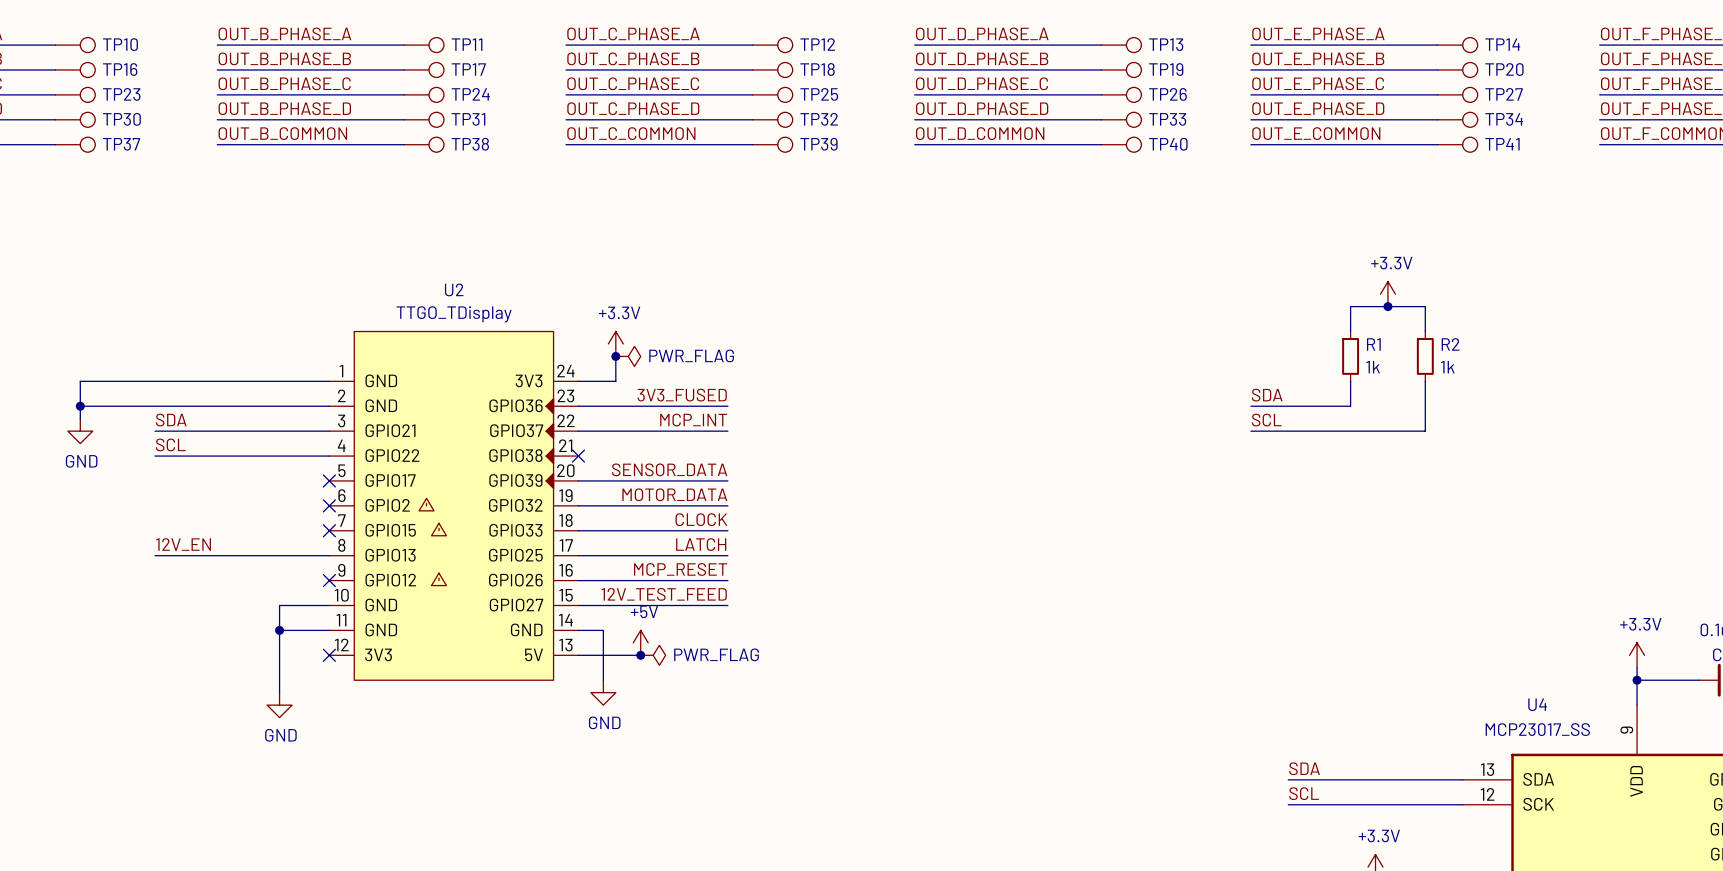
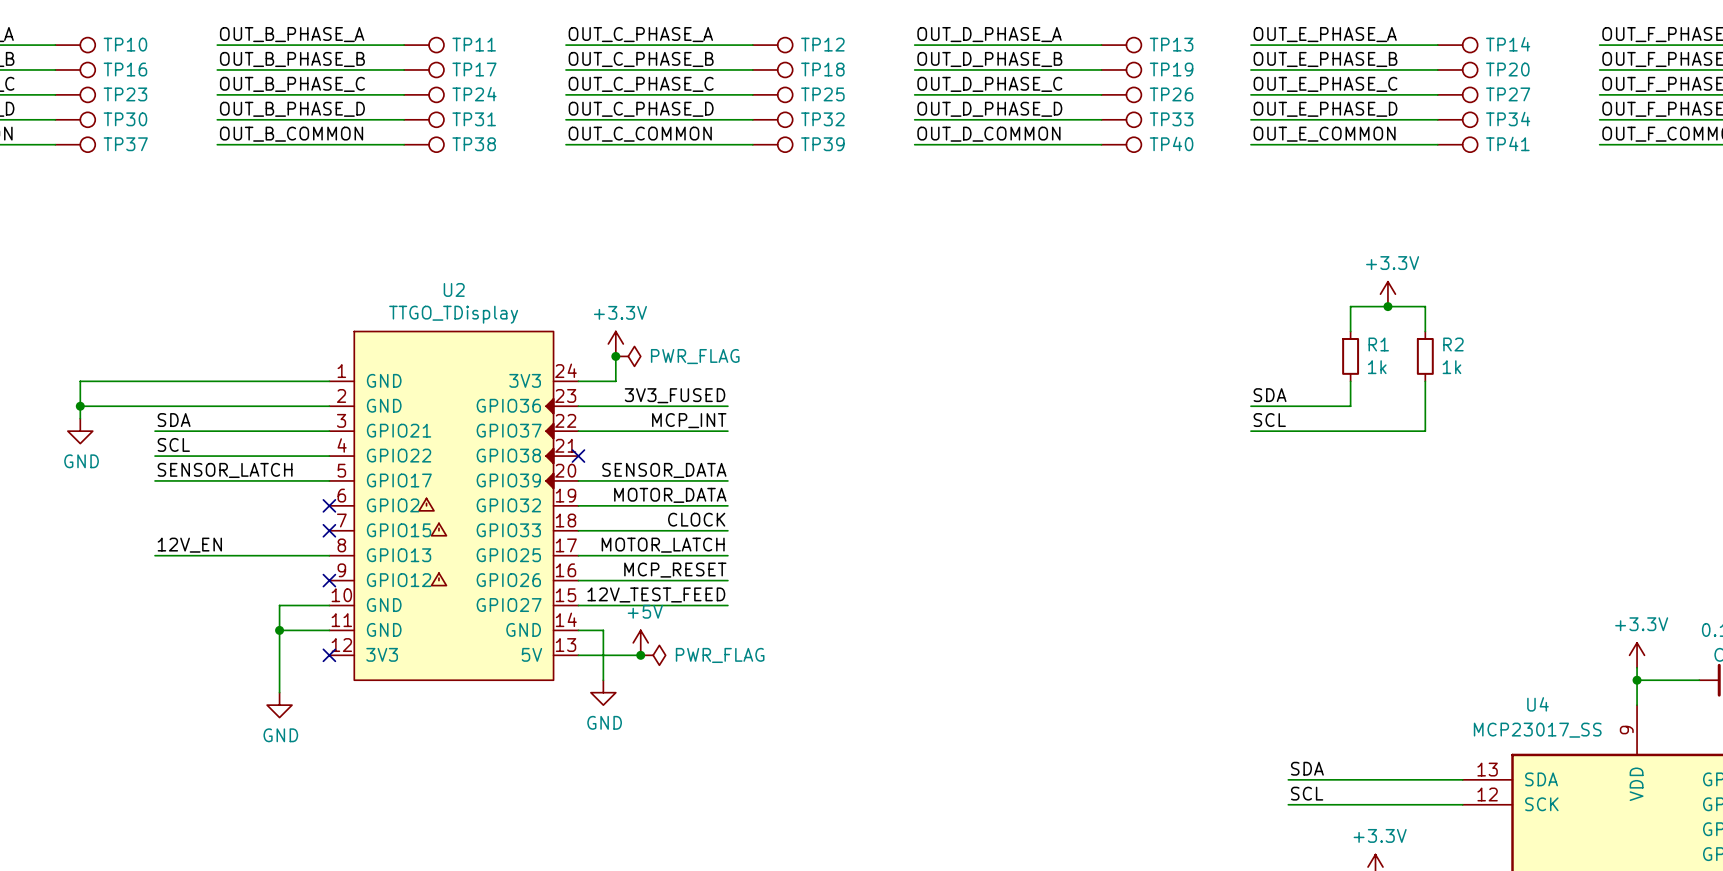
label: none -> SENSOR_LATCH (225, 470)
wire: none -> (155, 480) (329, 480)
no-connect mark: (329, 480) -> none
label: LATCH (701, 544) -> MOTOR_LATCH (663, 545)

